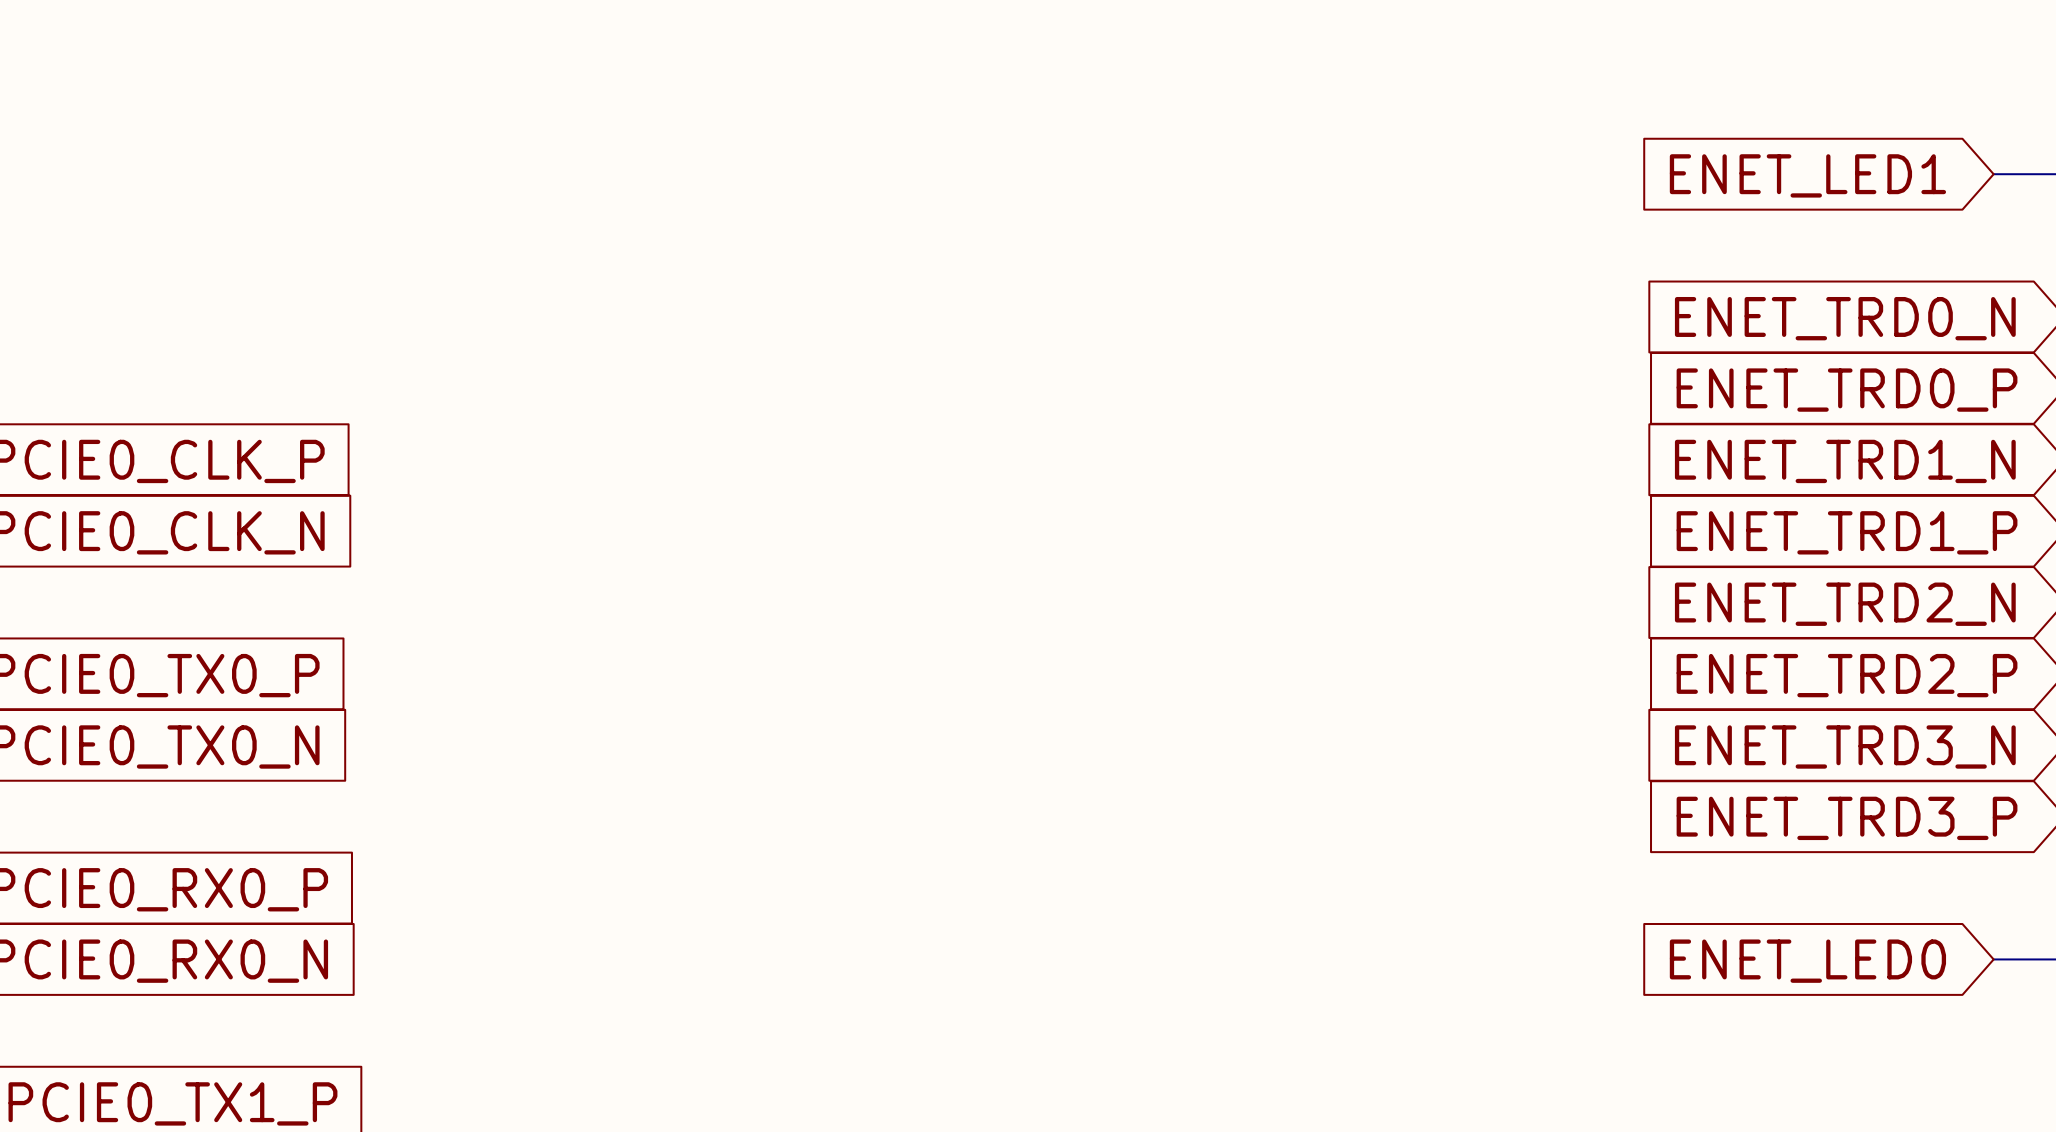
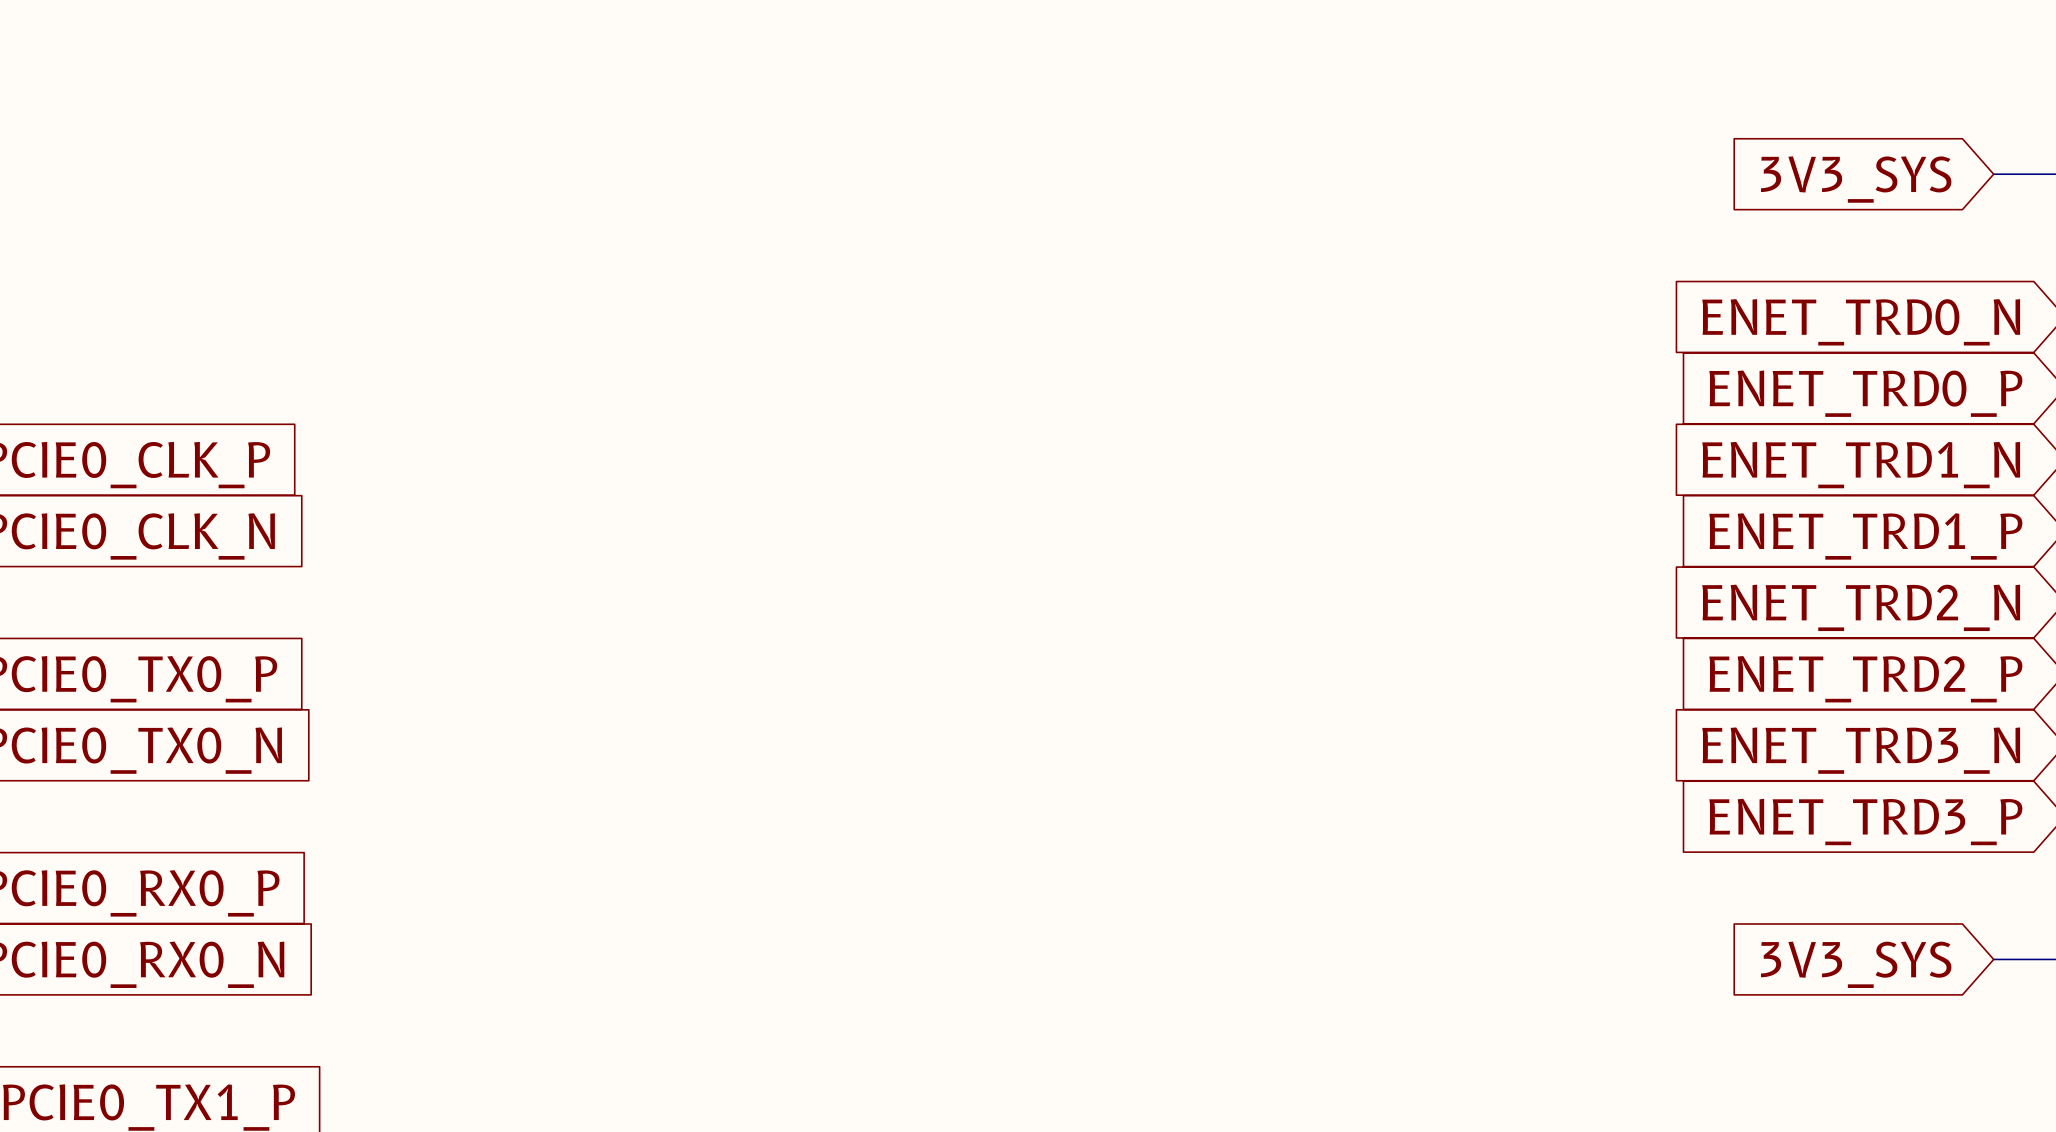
global label: ENET_LED1 (1807, 175) -> 3V3_SYS (1856, 179)
global label: ENET_LED0 (1807, 961) -> 3V3_SYS (1856, 964)

